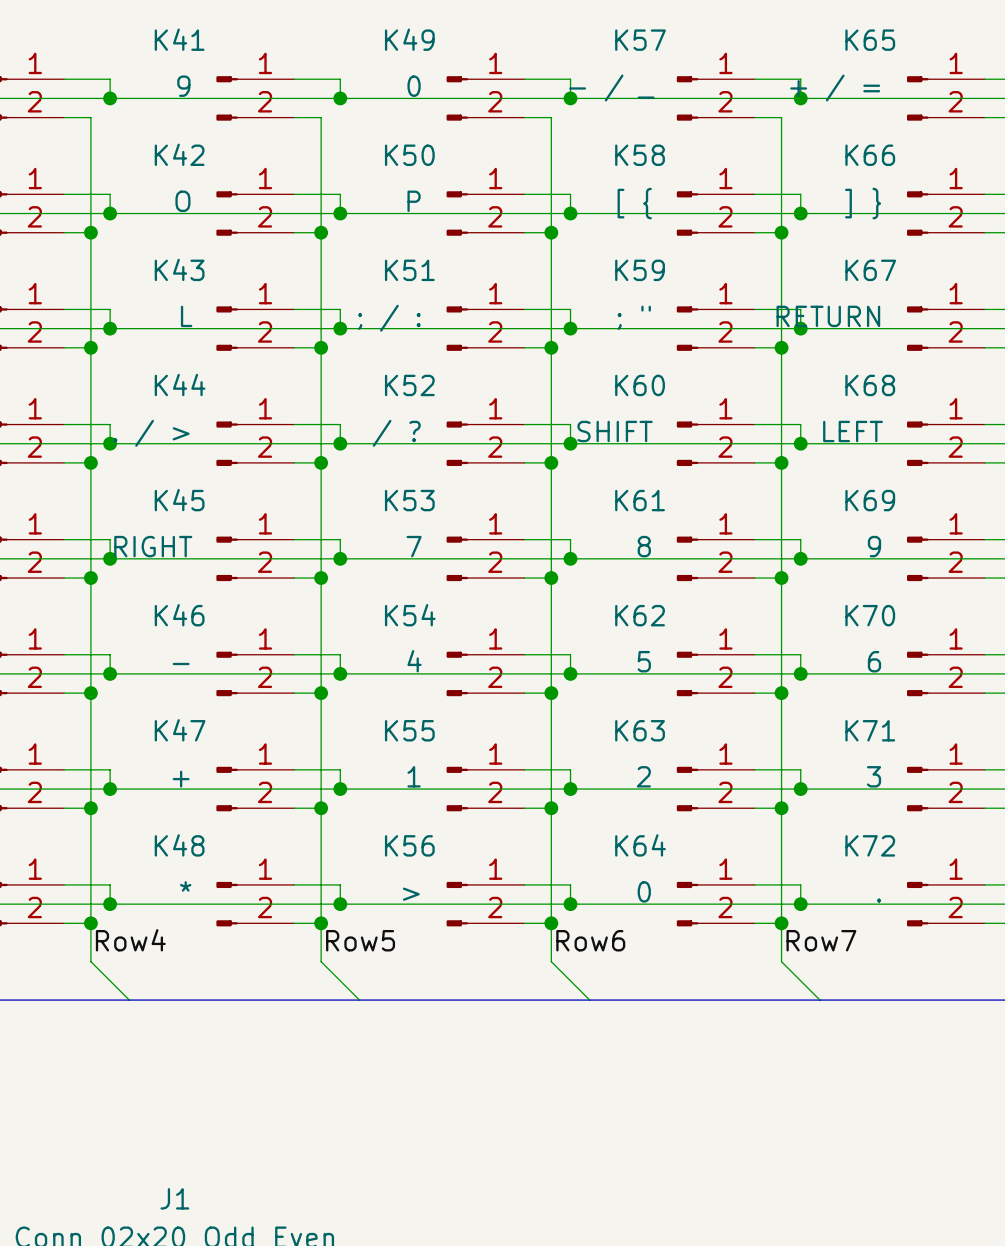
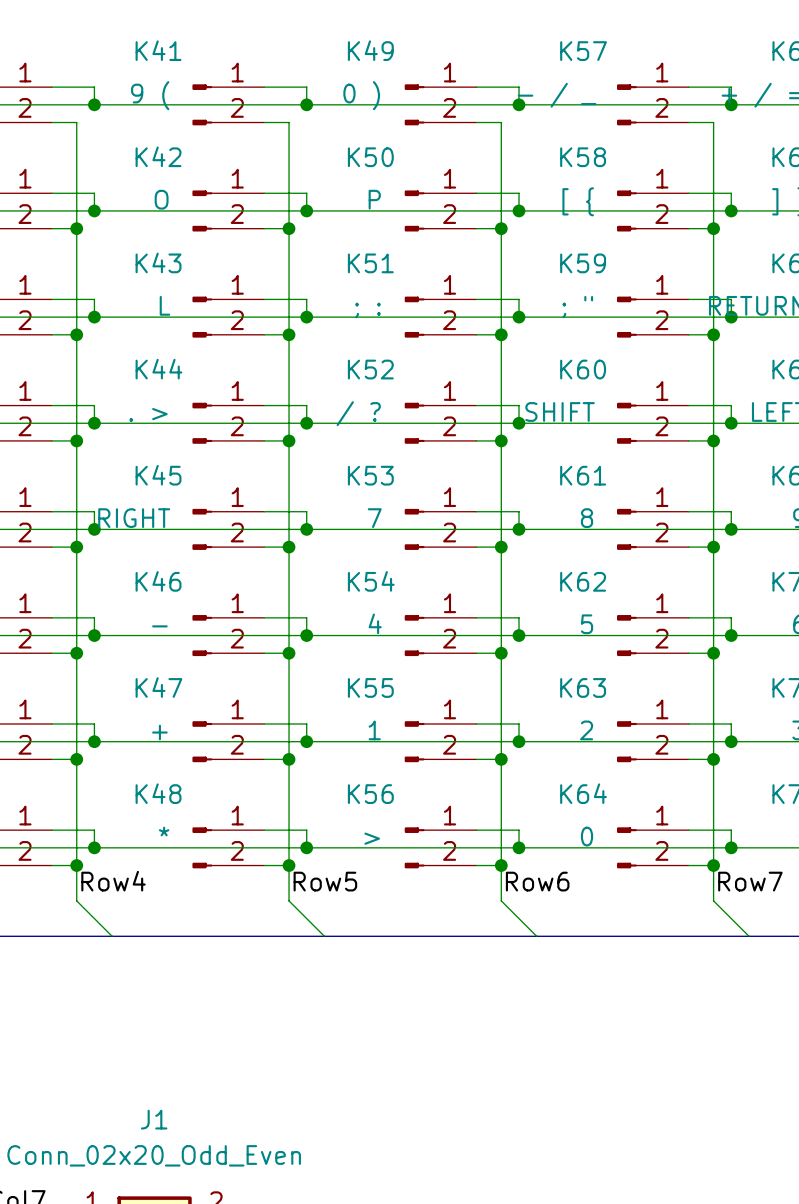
K41 value: 9 (183, 86) -> 9 ( (150, 95)
K49 value: 0 (414, 86) -> 0 ) (361, 95)
K51 value: ; / : (389, 318) -> ; : (367, 310)
K44 value: . / > (151, 433) -> . > (148, 414)

